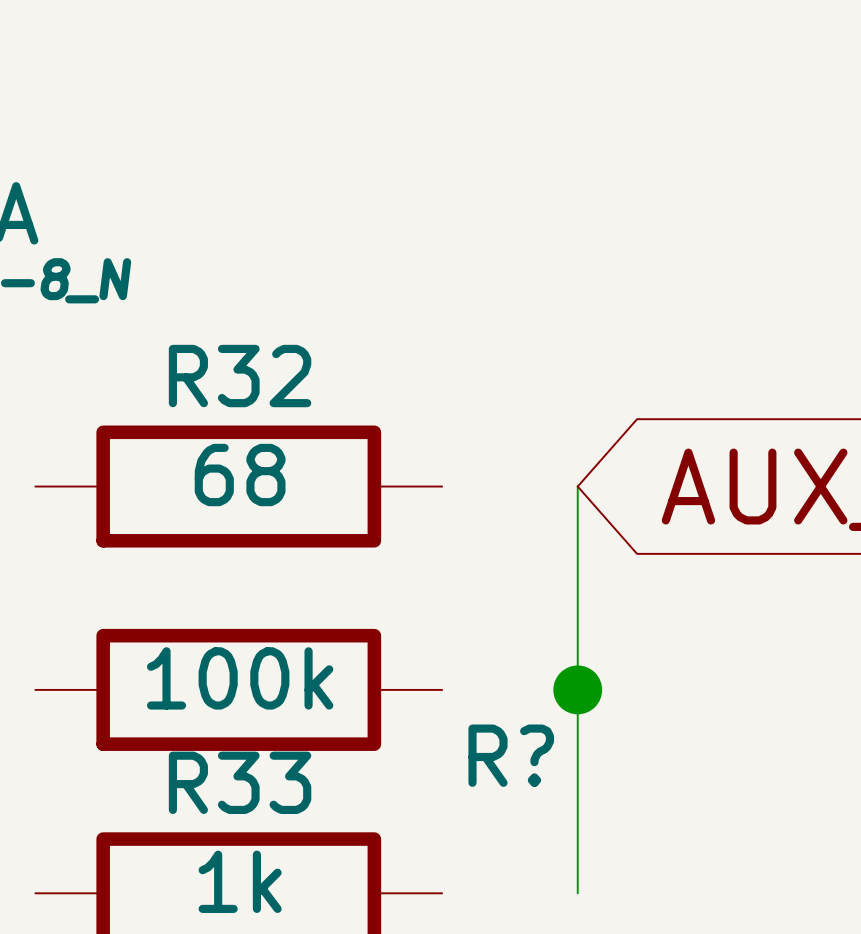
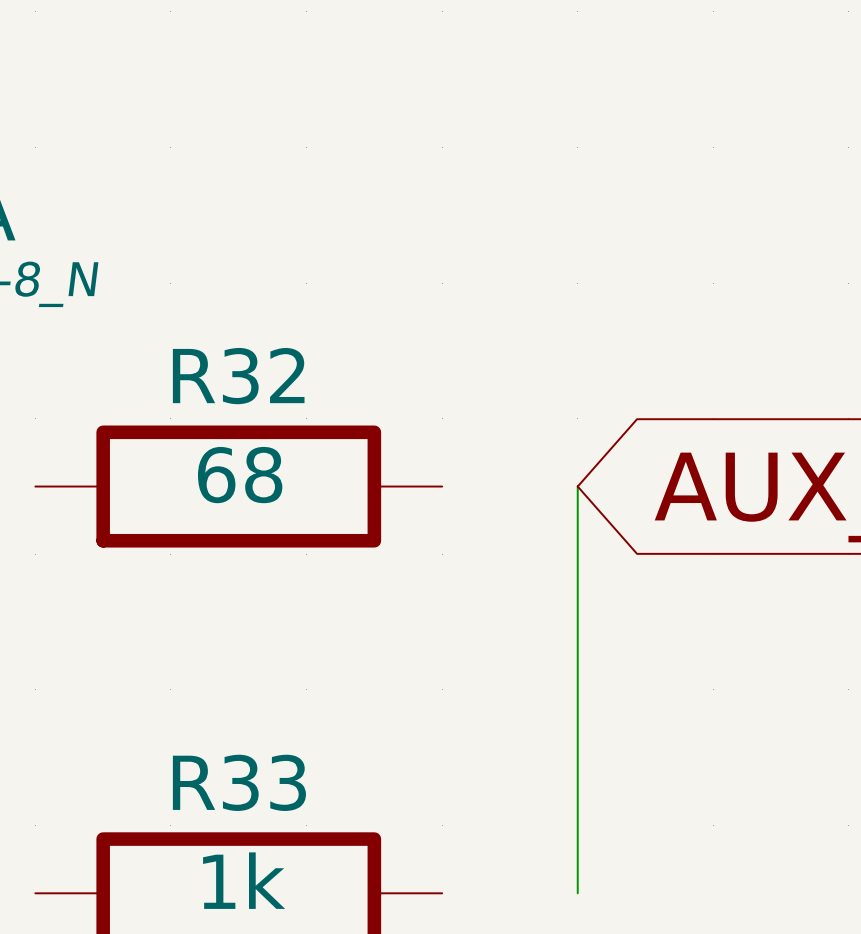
R?: 100k (238, 689) -> none
junction: (577, 689) -> none

